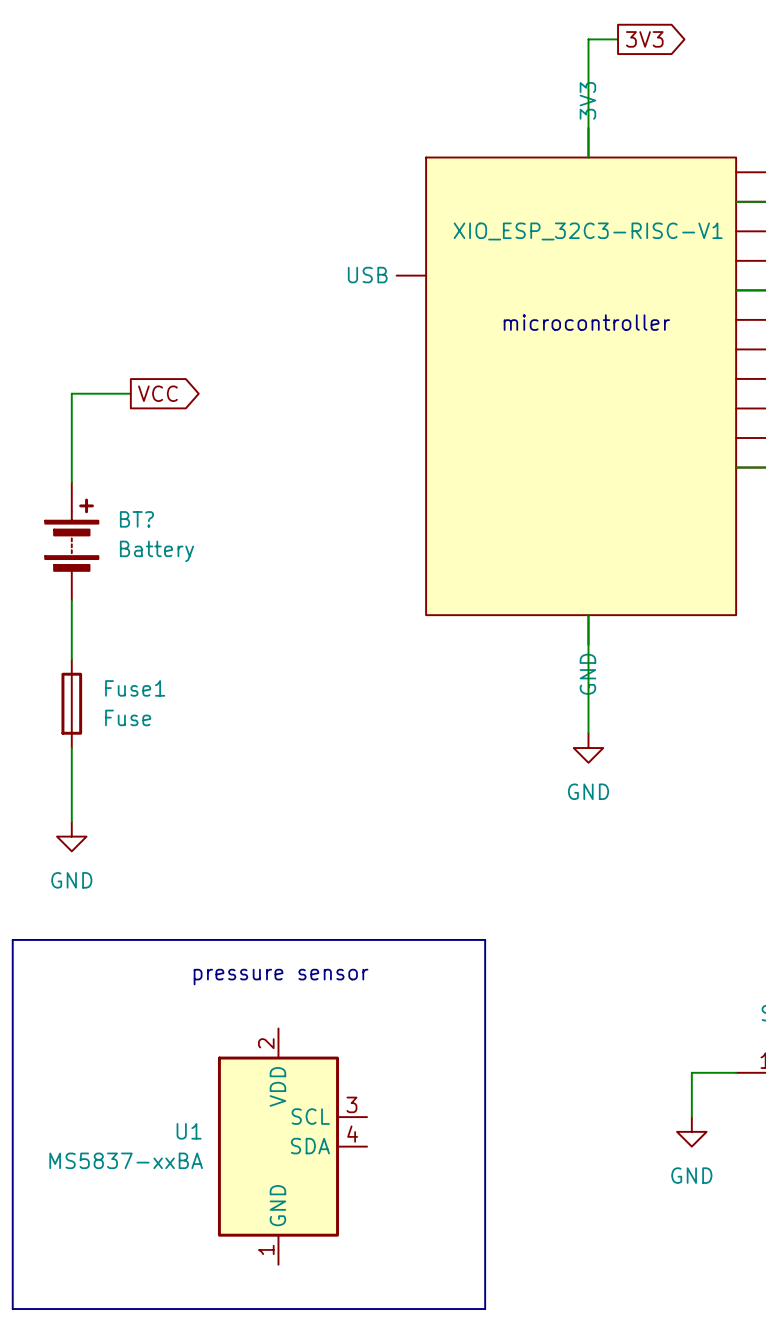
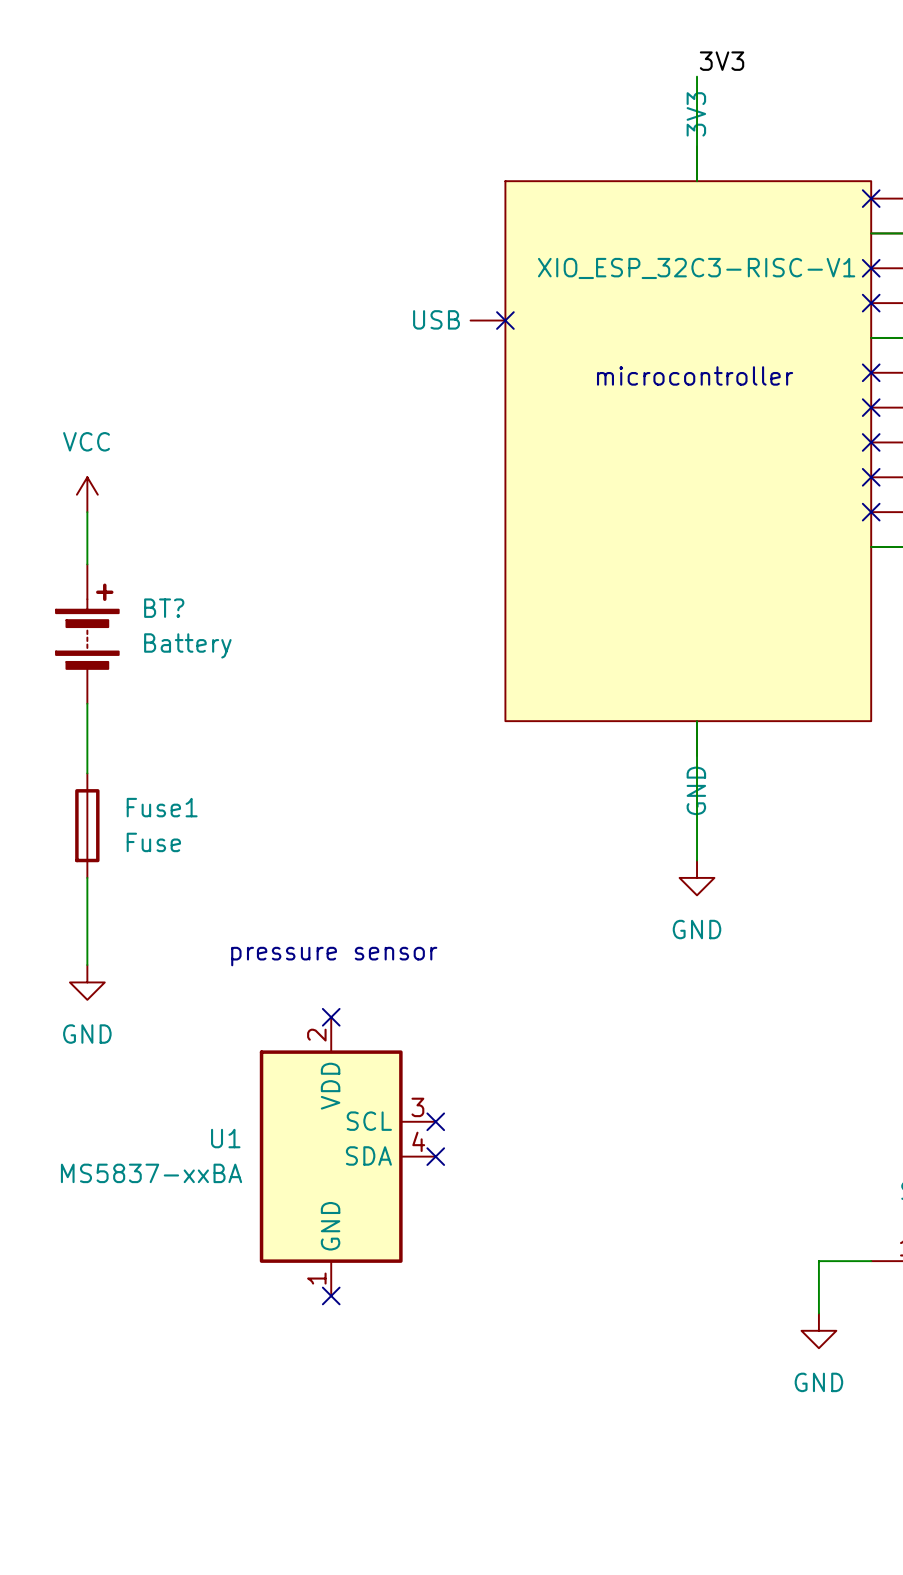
wire: (618, 39) (588, 39) (588, 68) -> none
global label: 3V3 (644, 39) -> none
label: none -> 3V3 (722, 61)
no-connect mark: none -> (871, 198)
no-connect mark: none -> (871, 268)
no-connect mark: none -> (871, 303)
no-connect mark: none -> (505, 320)
no-connect mark: none -> (871, 372)
no-connect mark: none -> (871, 407)
no-connect mark: none -> (871, 442)
wire: (130, 393) (71, 393) (71, 438) -> none
global label: VCC (157, 393) -> none
no-connect mark: none -> (871, 477)
power symbol: none -> VCC (87, 494)
no-connect mark: none -> (871, 512)
no-connect mark: none -> (331, 1017)
line: (12, 939) (485, 939) (485, 1309) (12, 1309) (12, 939) -> none
no-connect mark: none -> (435, 1121)
text position: pressure sensor (281, 977) -> pressure sensor (334, 956)
no-connect mark: none -> (435, 1156)
no-connect mark: none -> (331, 1295)
U1 position: (292, 1146) -> (347, 1156)

